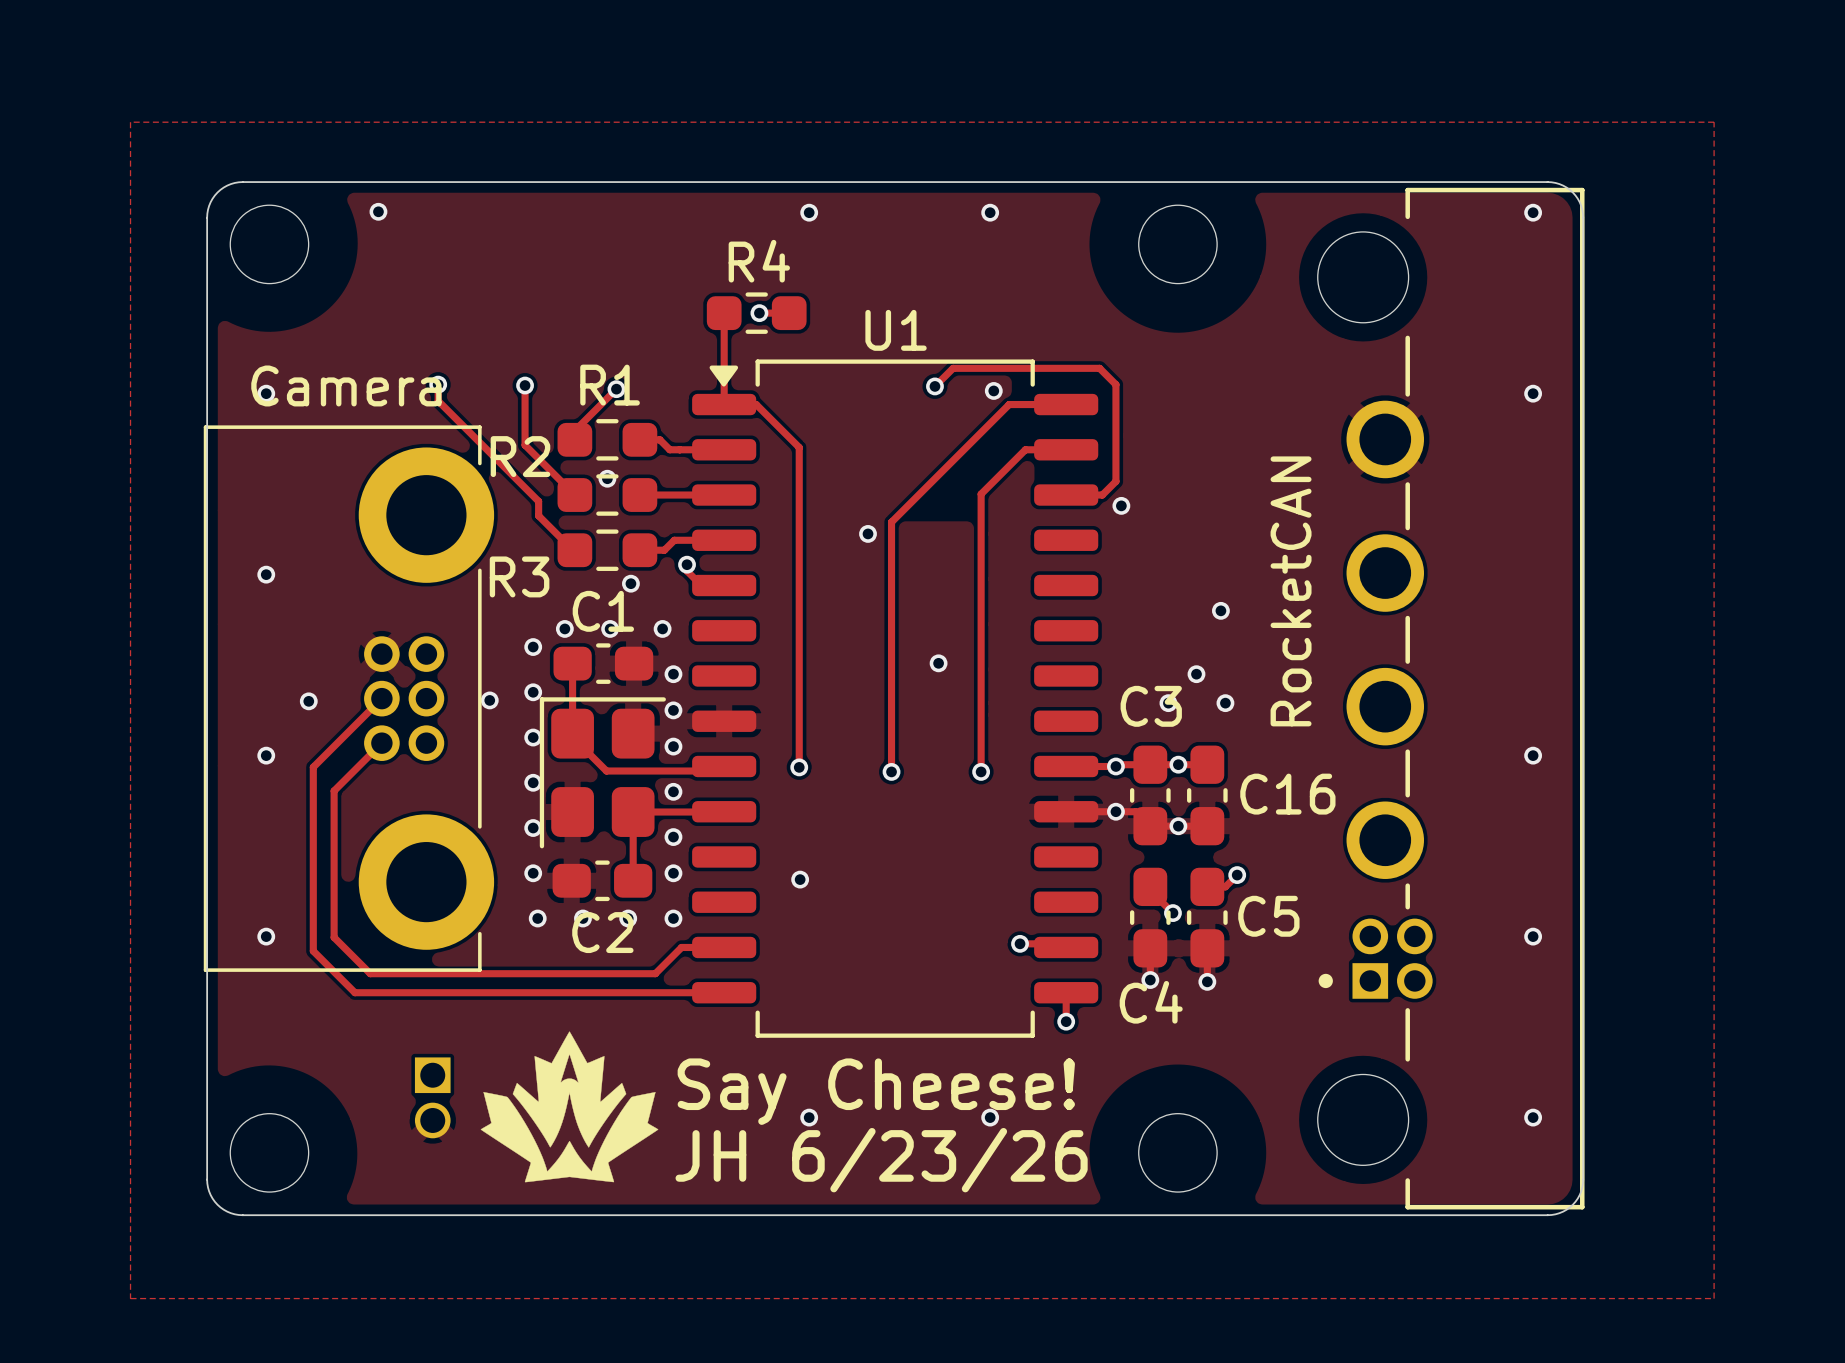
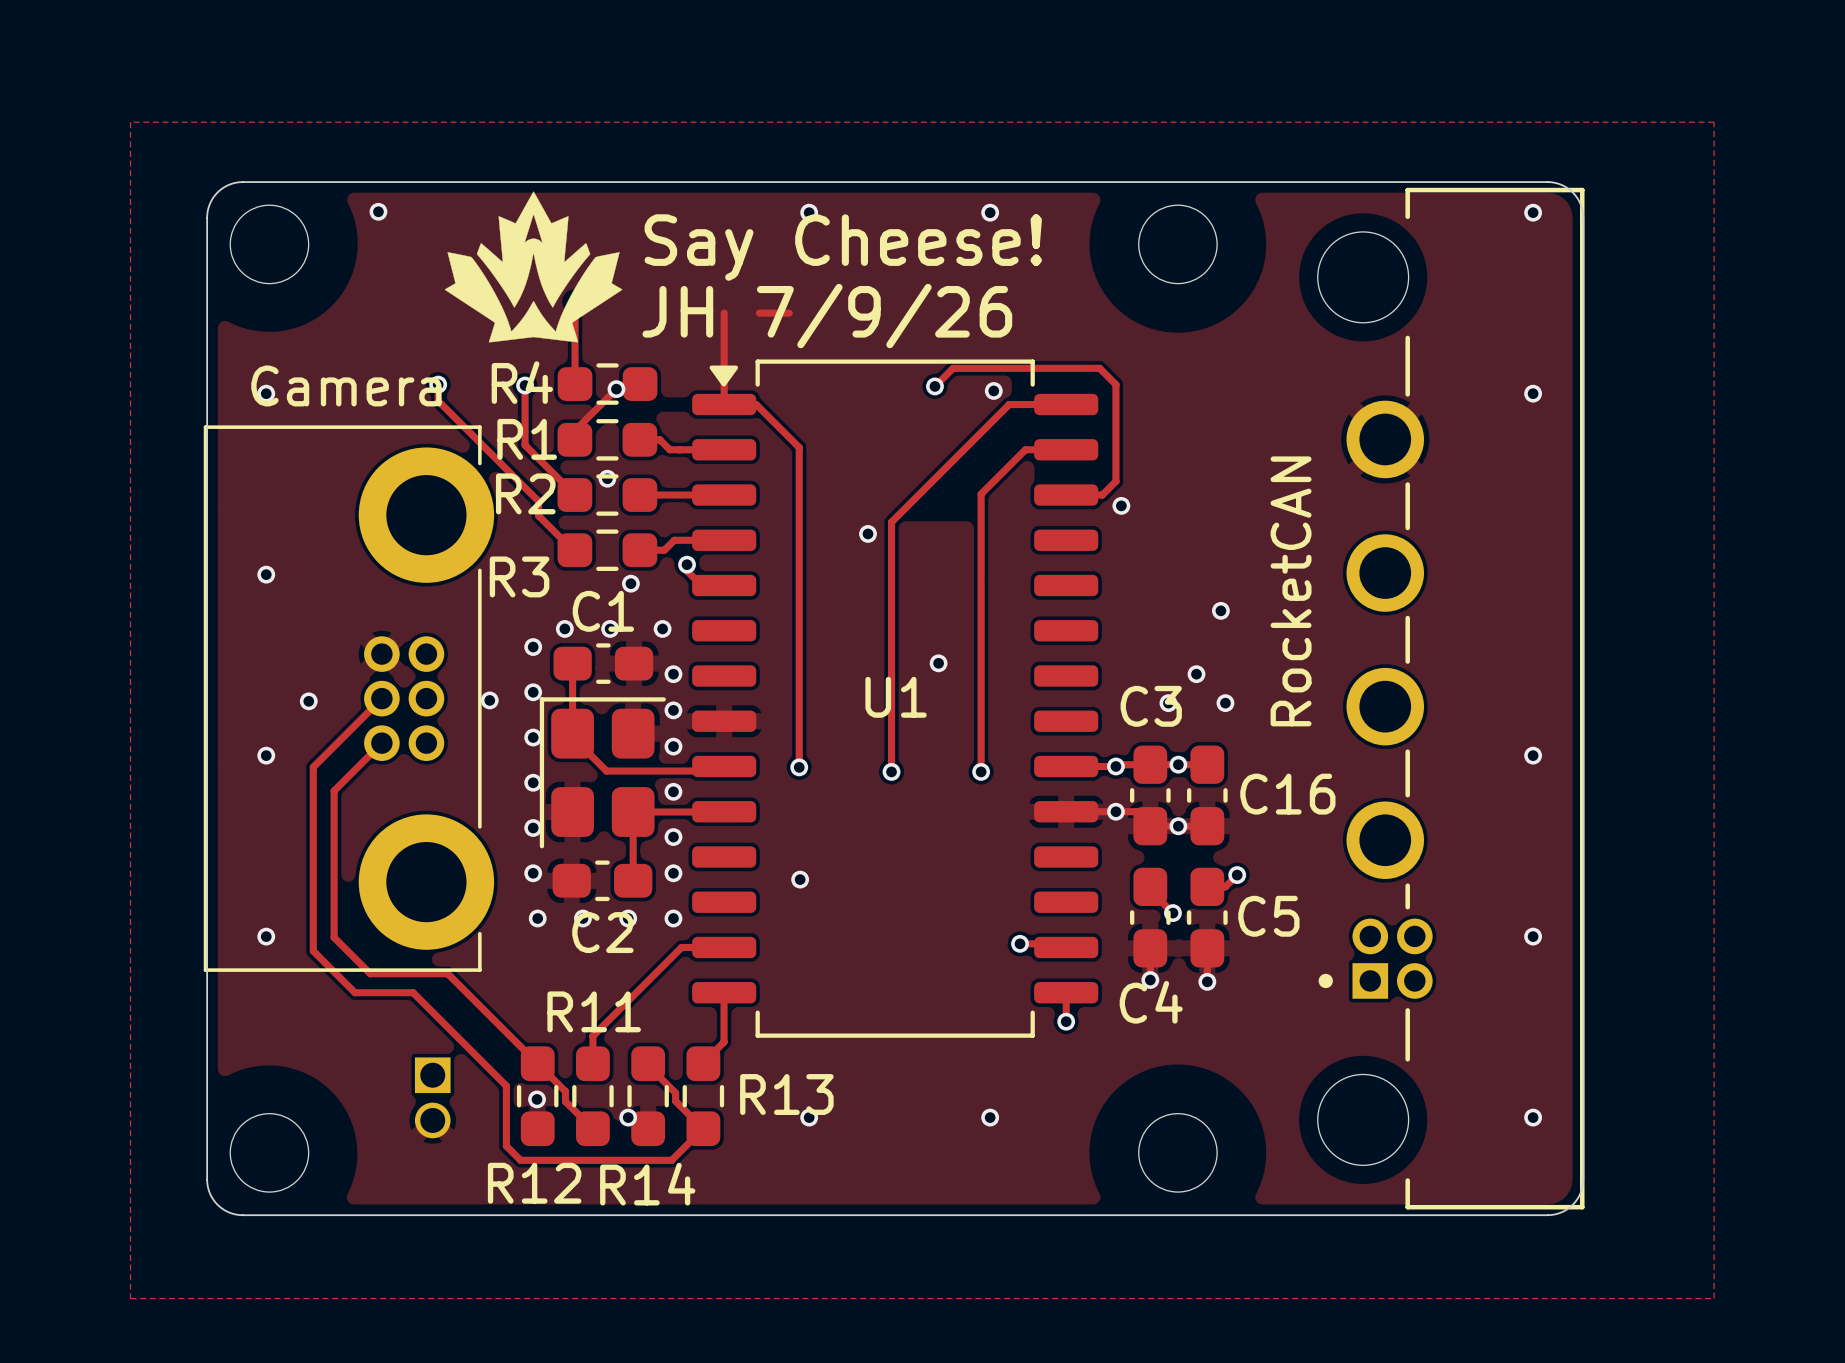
R4 name position: R4 (759, 261) -> R4 (522, 382)
track: none -> (575, 302) (575, 384)
R4 position: (756, 313) -> (607, 384)
via: (759, 313) -> none
text: none -> JH 7/9/26 (827, 316)
U1 name position: U1 (896, 330) -> U1 (896, 697)
R1 name position: R1 (610, 385) -> R1 (527, 439)
R2 name position: R2 (520, 456) -> R2 (525, 493)
track: (447, 973) (655, 973) -> (447, 973) (565, 1091) (565, 1101) (592, 1128)
track: none -> (655, 973) (592, 1036) (592, 1063)
track: (413, 992) (724, 992) -> (413, 992) (506, 1085) (506, 1146) (520, 1160) (671, 1160) (703, 1128)
track: none -> (724, 992) (724, 1042) (703, 1063)
track: none -> (648, 1063) (675, 1093) (675, 1101) (703, 1128)
text position: Say Cheese! (876, 1091) -> Say Cheese! (843, 247)
R12: none -> (537, 1096)
R11: none -> (592, 1096)
R14: none -> (648, 1096)
R13: none -> (703, 1096)
via: none -> (537, 1099)
drawing position: (569, 1106) -> (533, 266)
text: JH 6/23/26 (881, 1160) -> none

